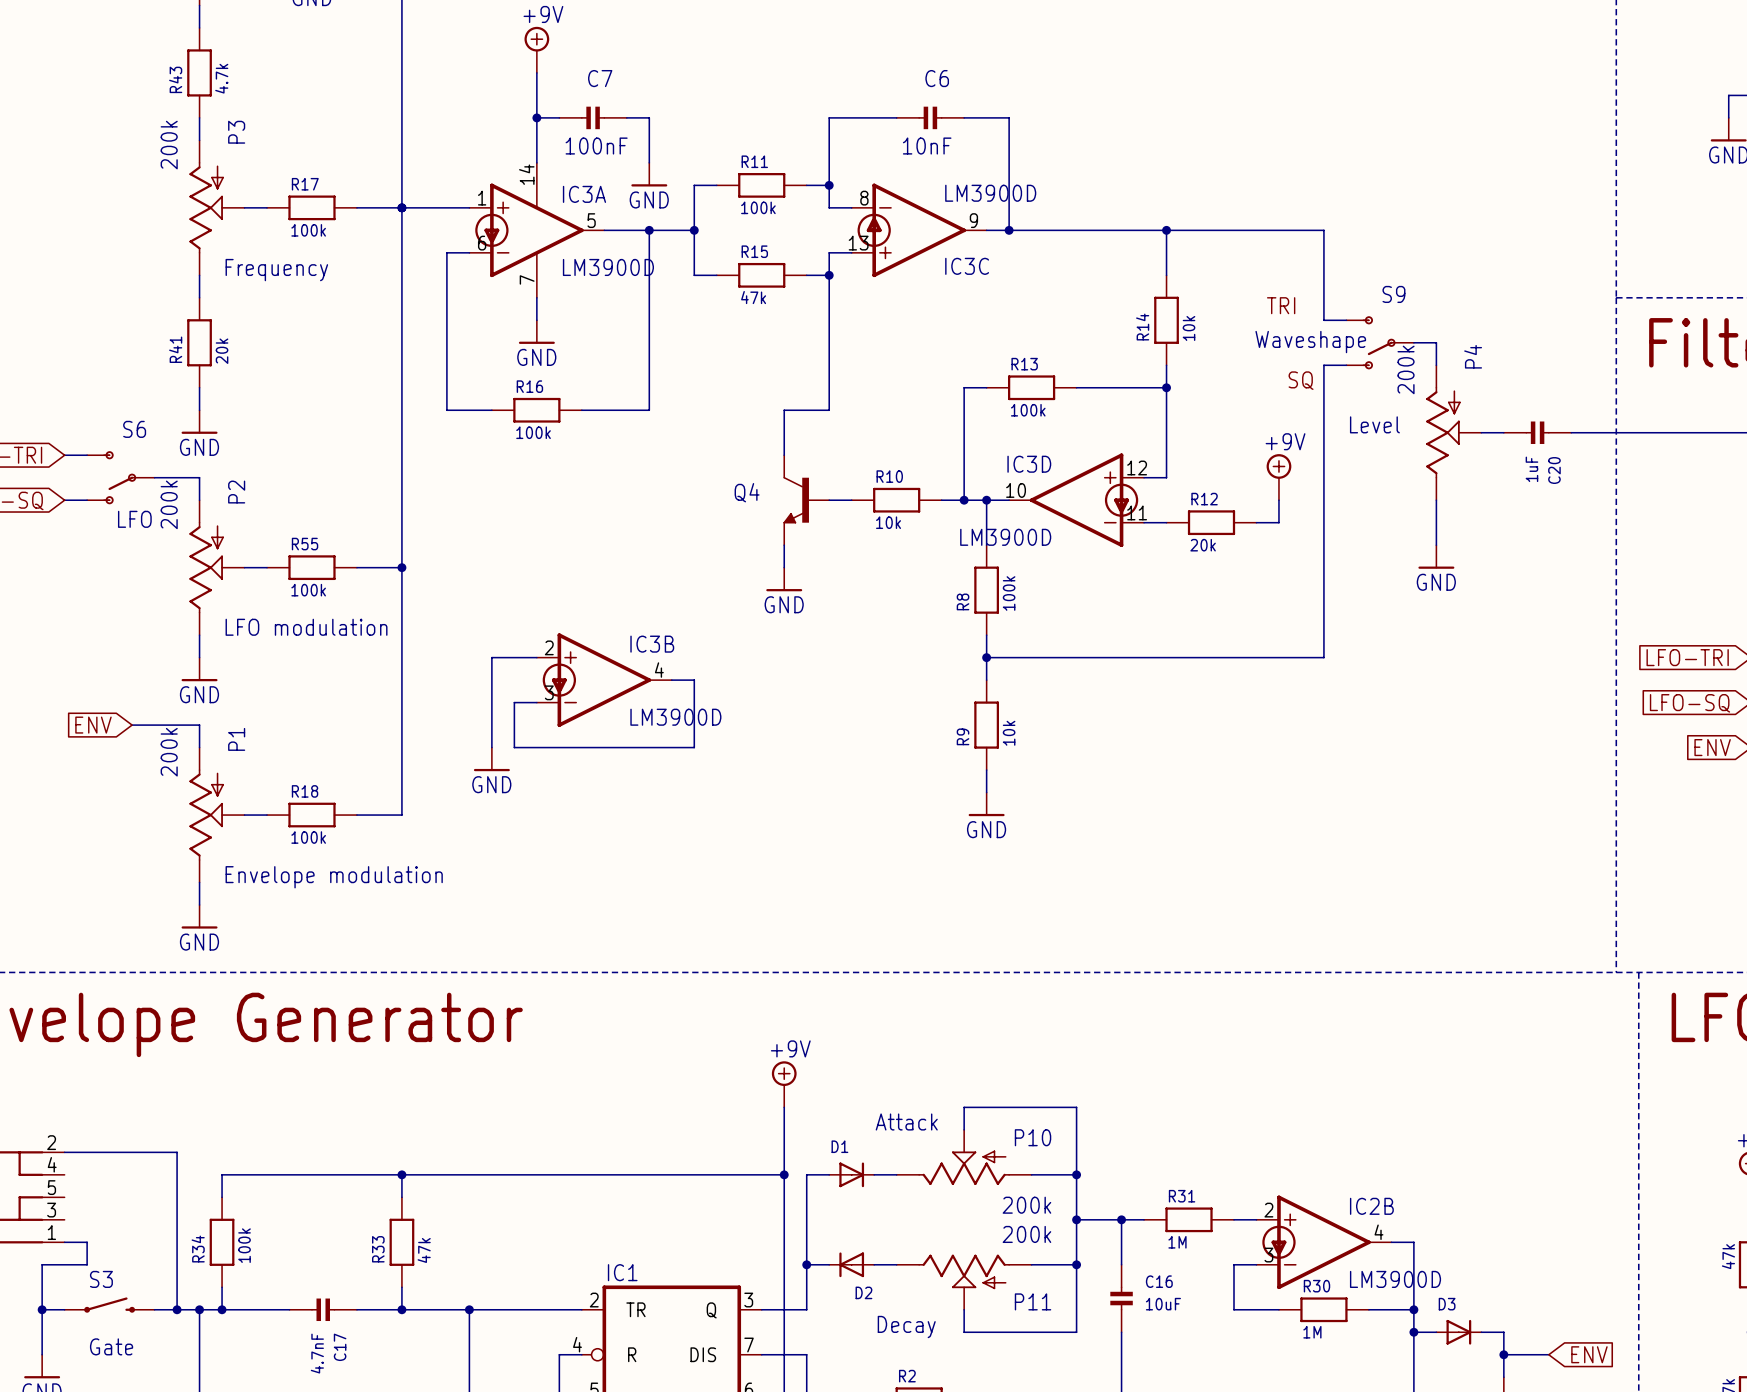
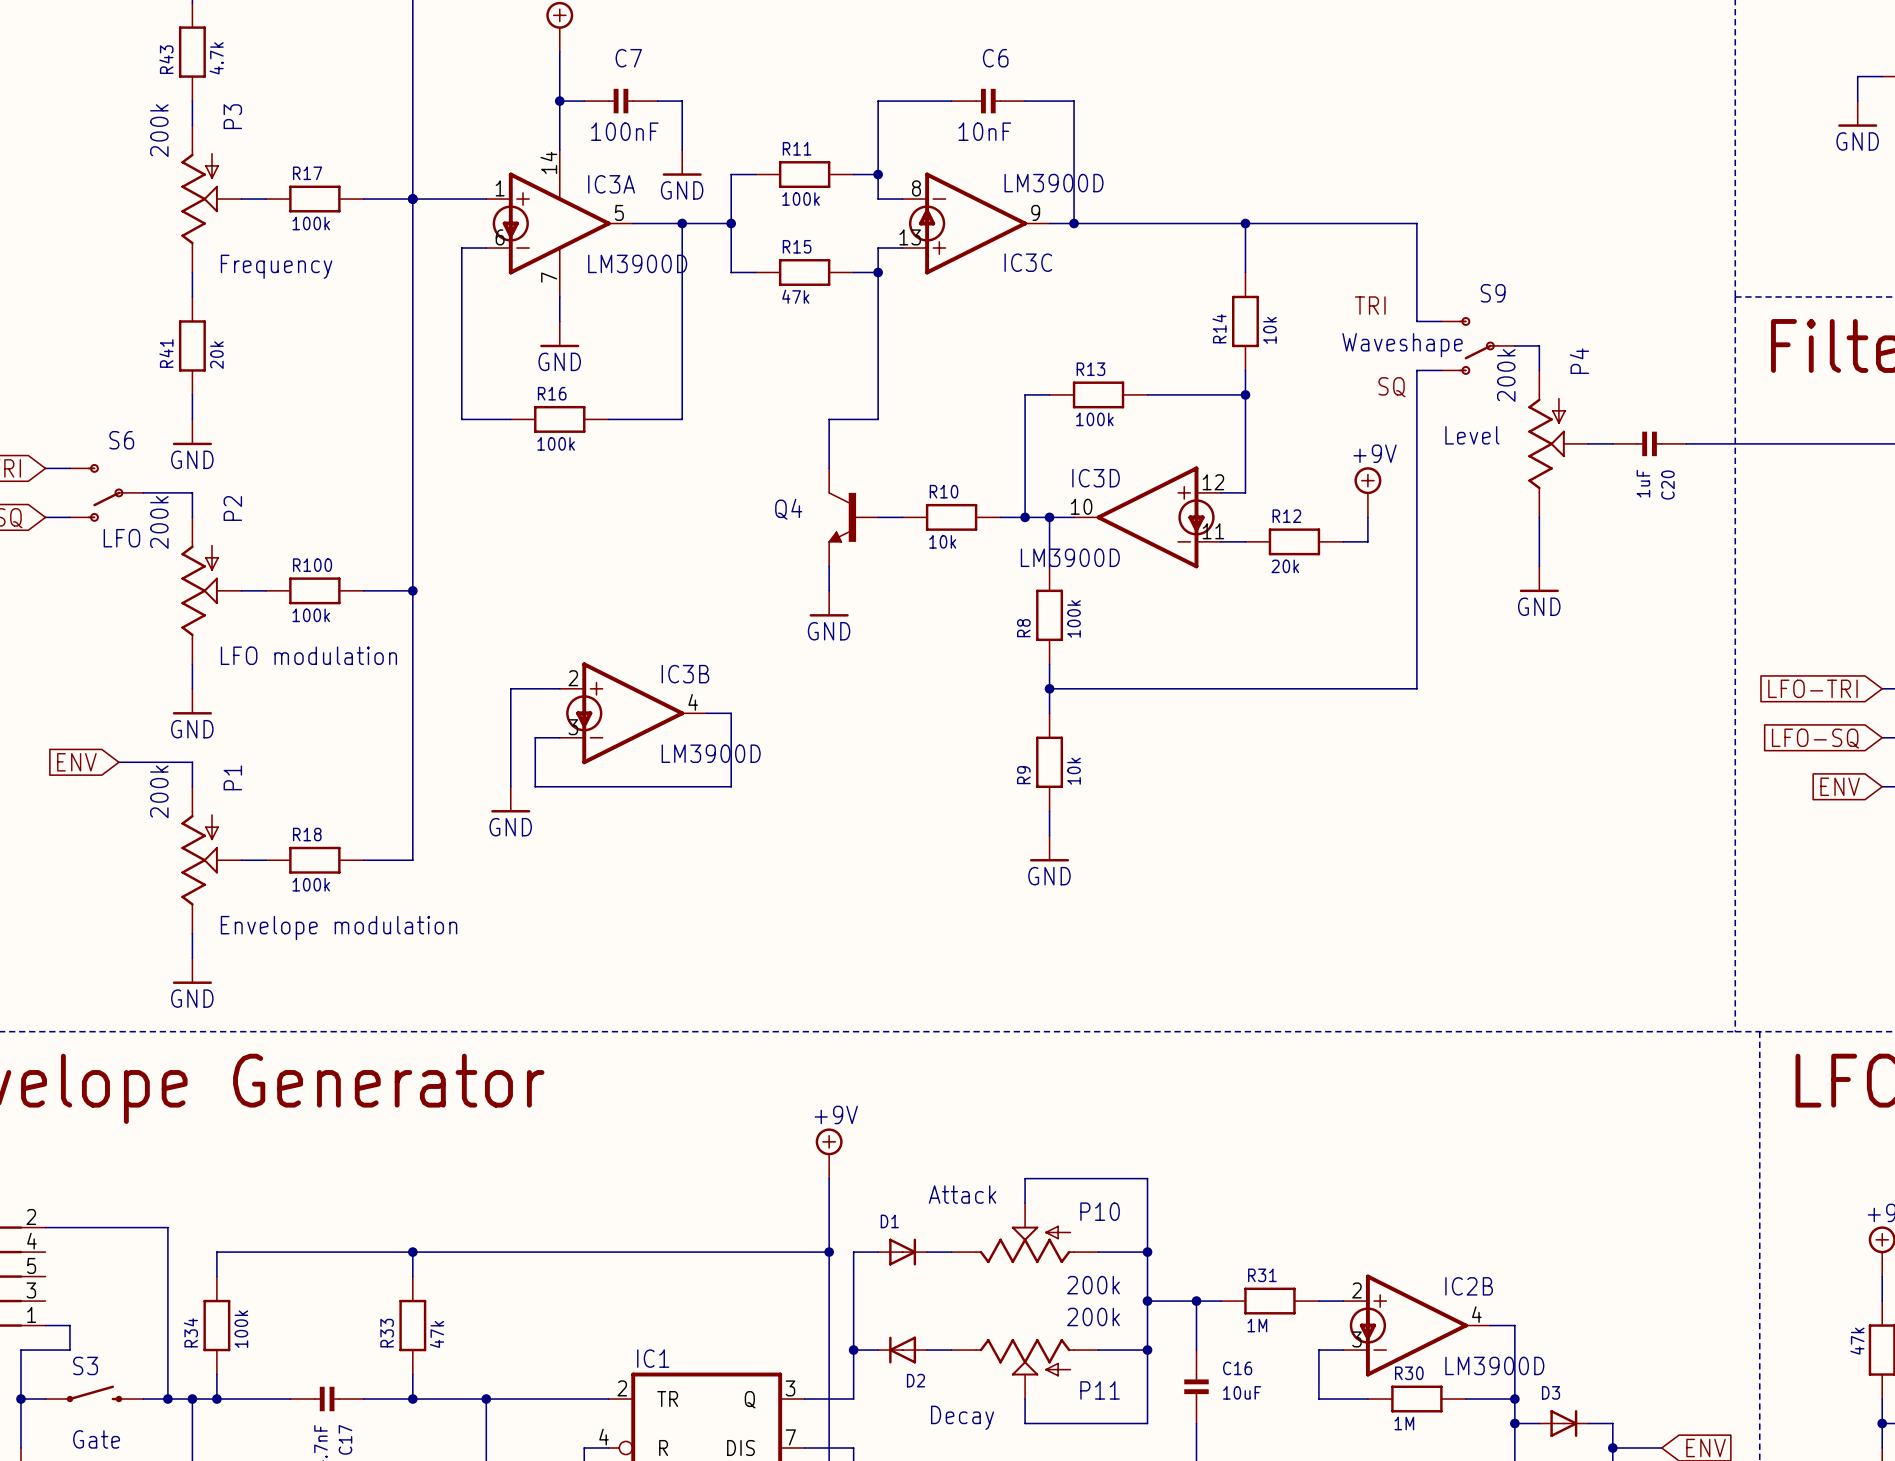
R55 name: R55 (305, 544) -> R100 (312, 565)

